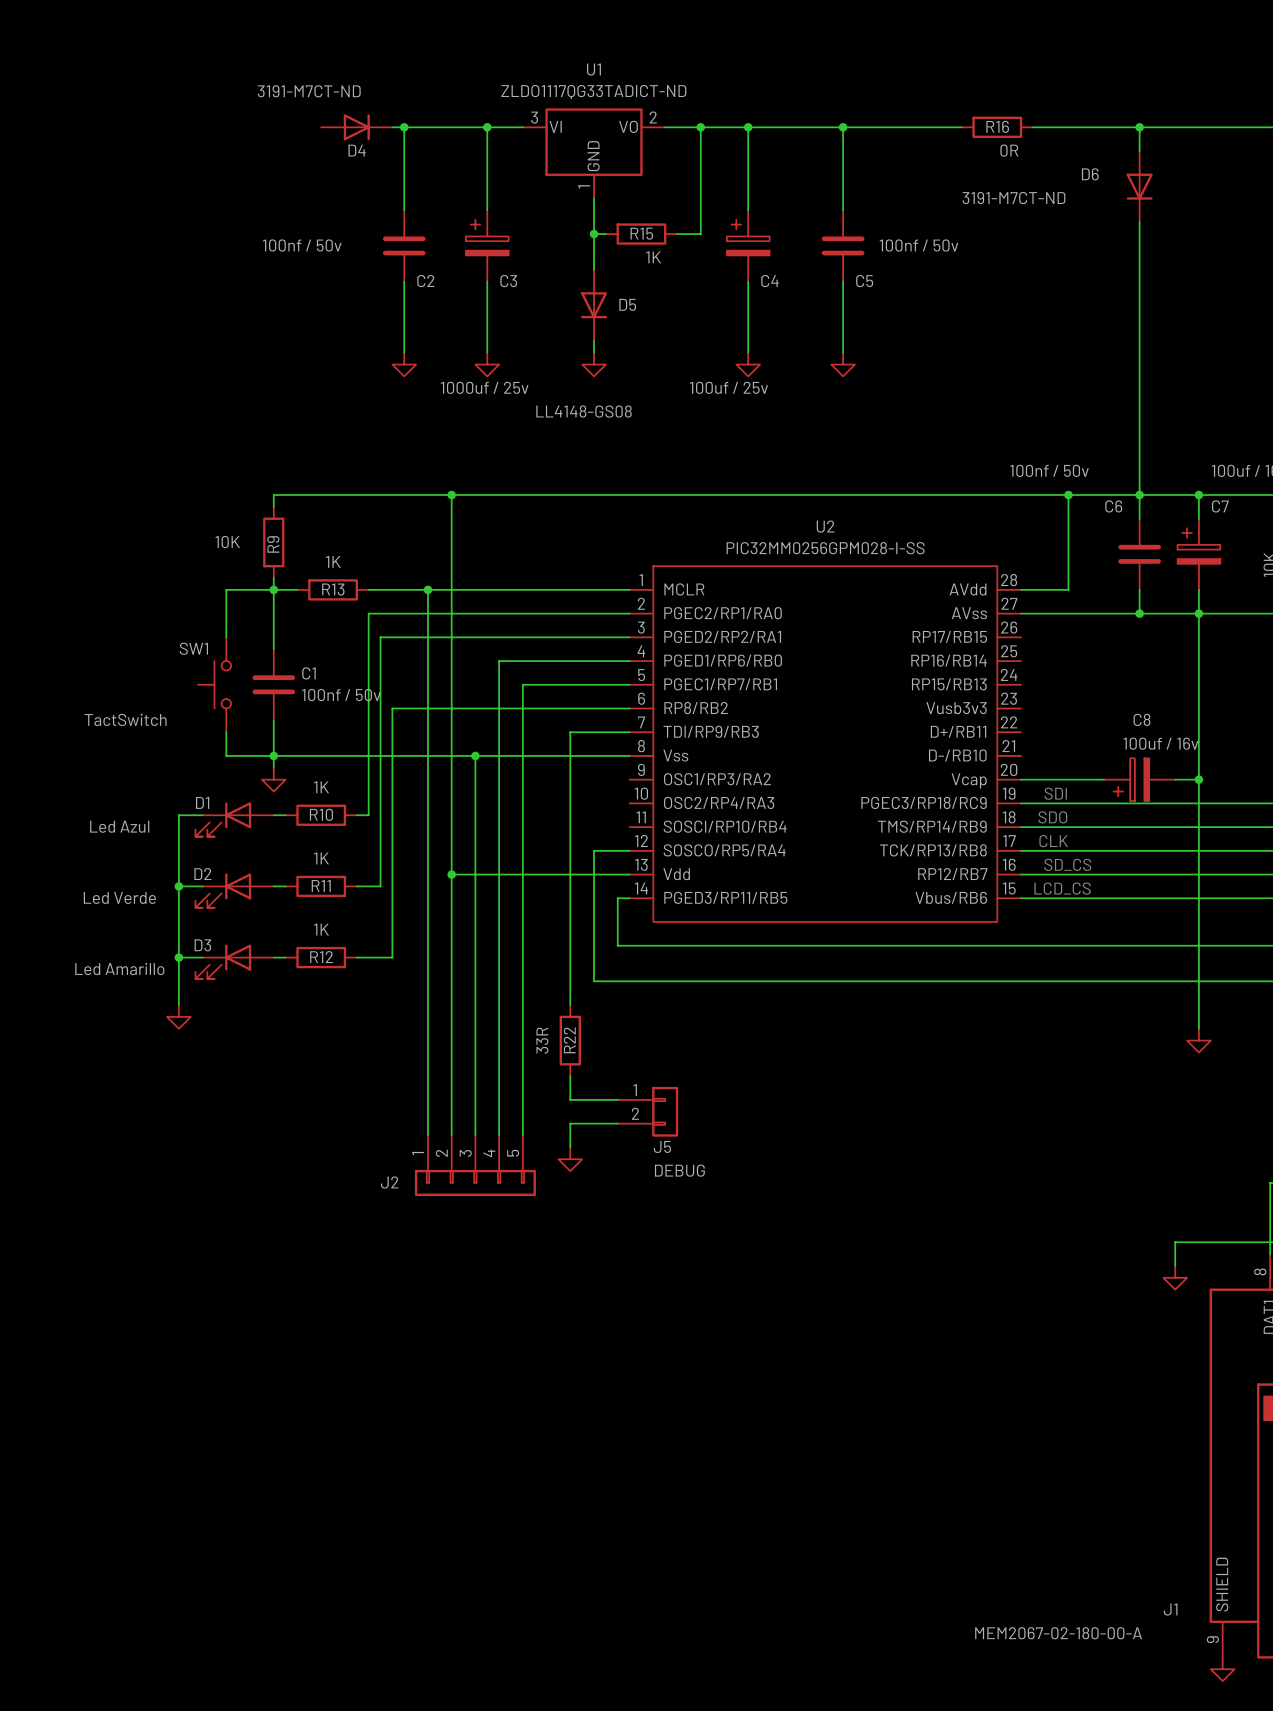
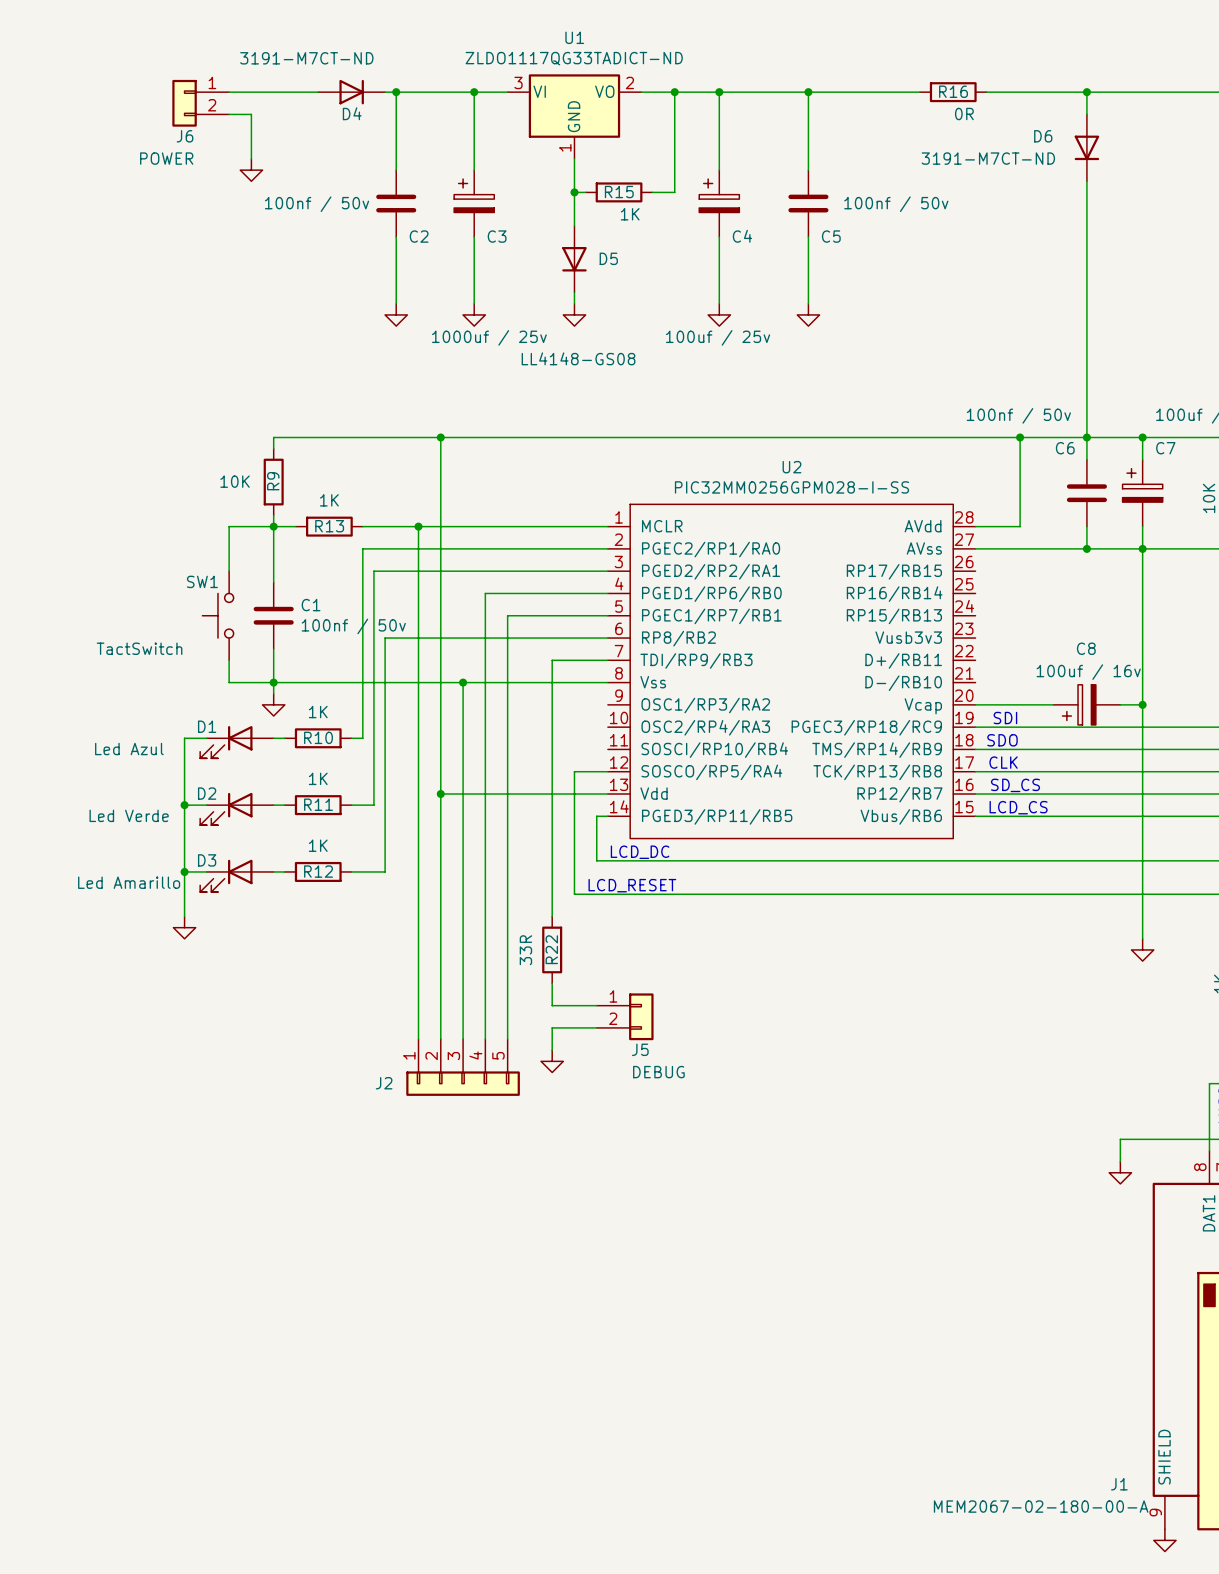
wire: none -> (229, 92) (318, 92)
J6: none -> POWER (200, 103)
wire: none -> (229, 114) (251, 114) (251, 158)
power symbol: none -> (251, 170)
text: none -> LCD_DC (640, 852)
text: none -> LCD_RESET (632, 885)

